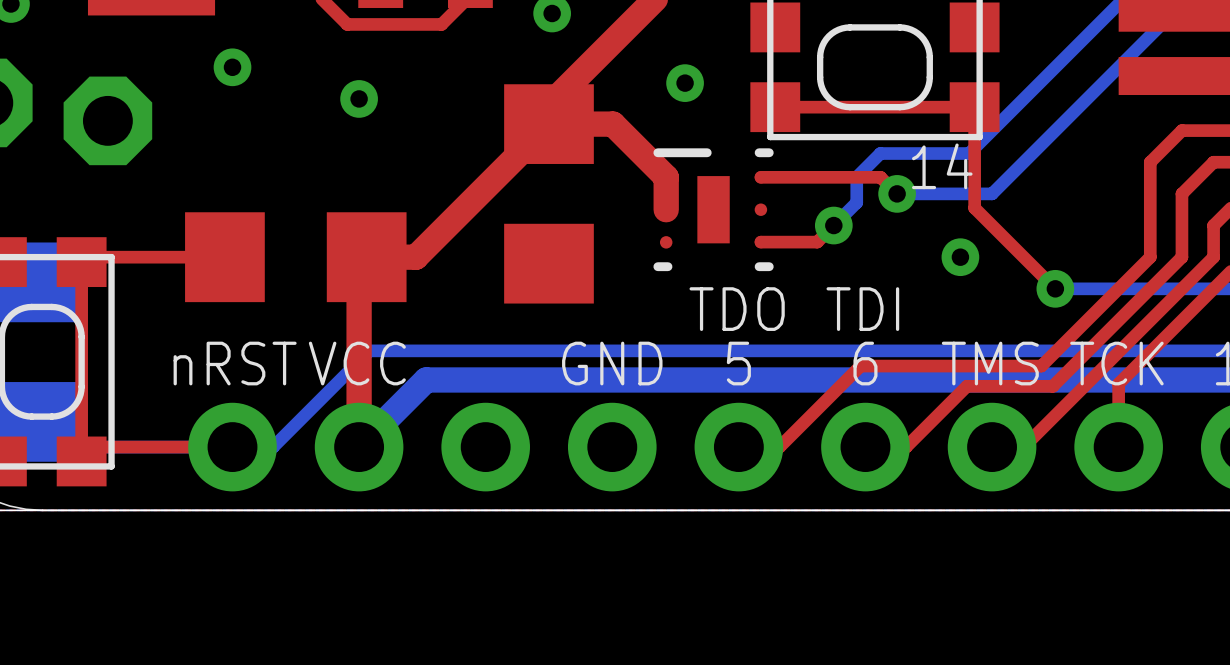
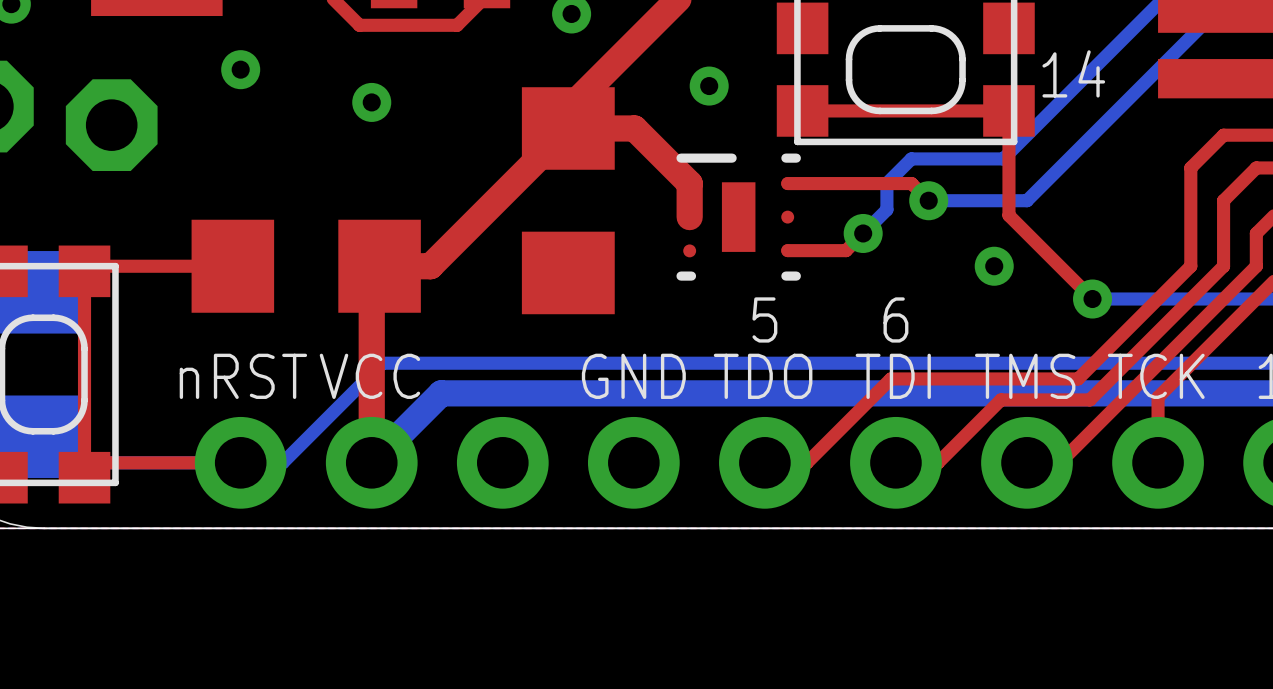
text position: 14 (942, 166) -> 14 (1073, 73)
text: TDO (737, 309) -> 5 (764, 319)
text: TDI (862, 309) -> 6 (895, 319)
text: 5 (738, 363) -> TDO (763, 376)
text: 6 (865, 363) -> TDI (893, 376)

